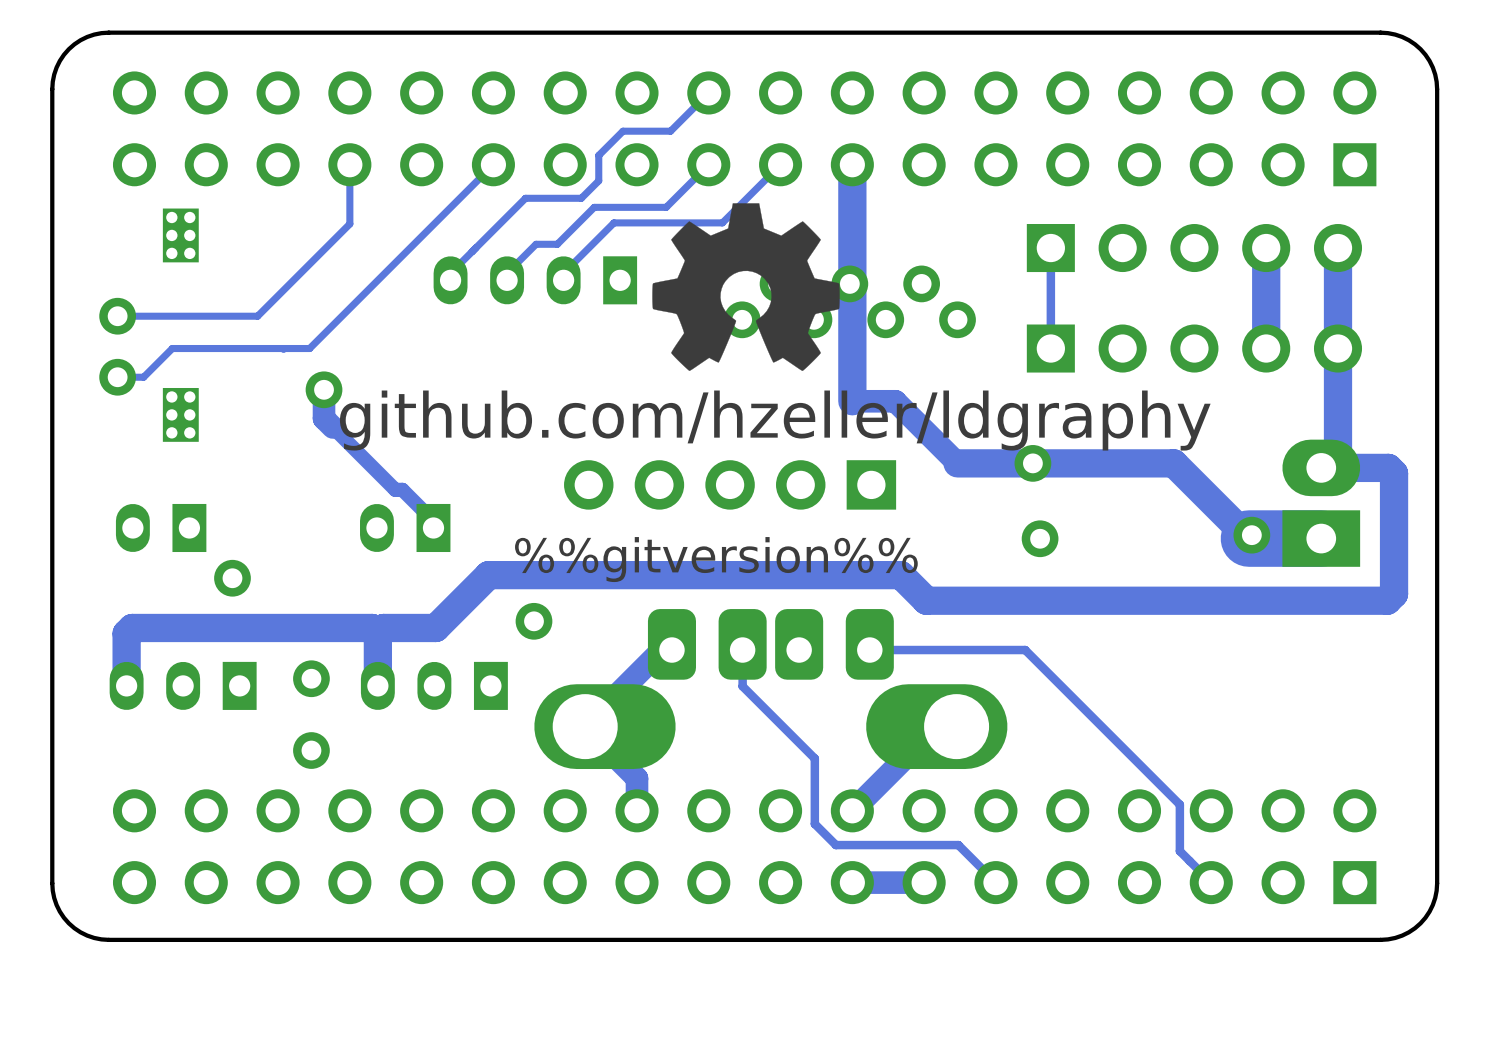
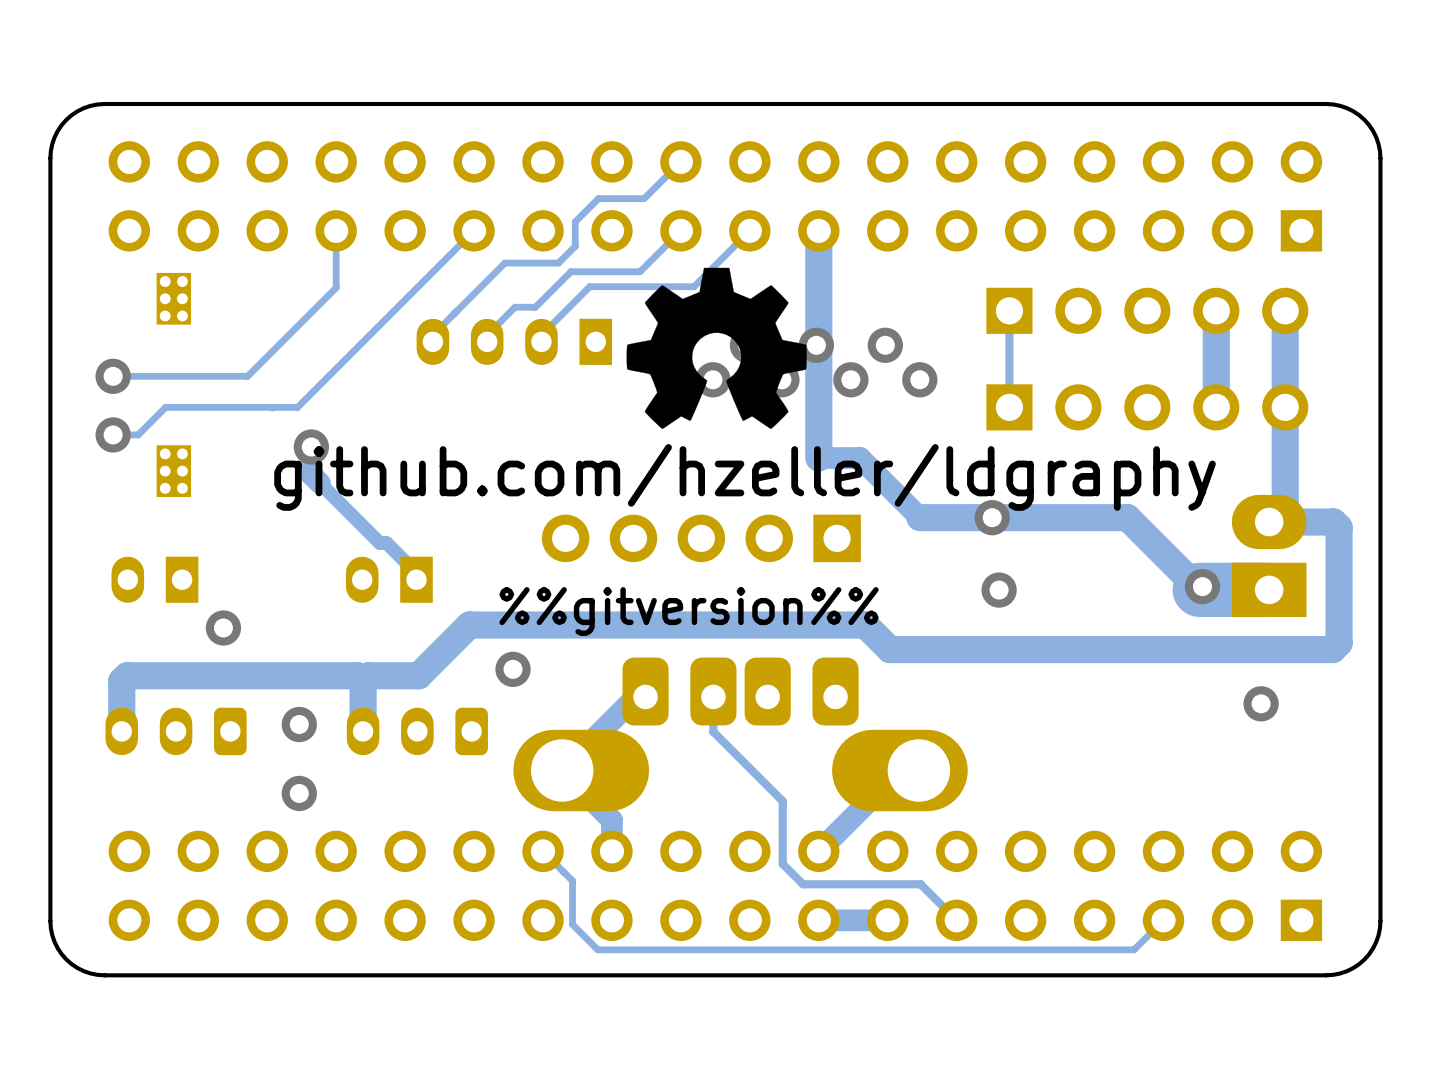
track: (869, 650) (1025, 650) (1179, 804) (1179, 851) (1211, 882) -> (543, 851) (572, 880) (572, 924) (597, 949) (1134, 949) (1163, 920)
via: none -> (1261, 703)
part footprint: [109, 661, 257, 710] -> [105, 707, 247, 756]
part footprint: [360, 661, 508, 710] -> [346, 707, 488, 756]

